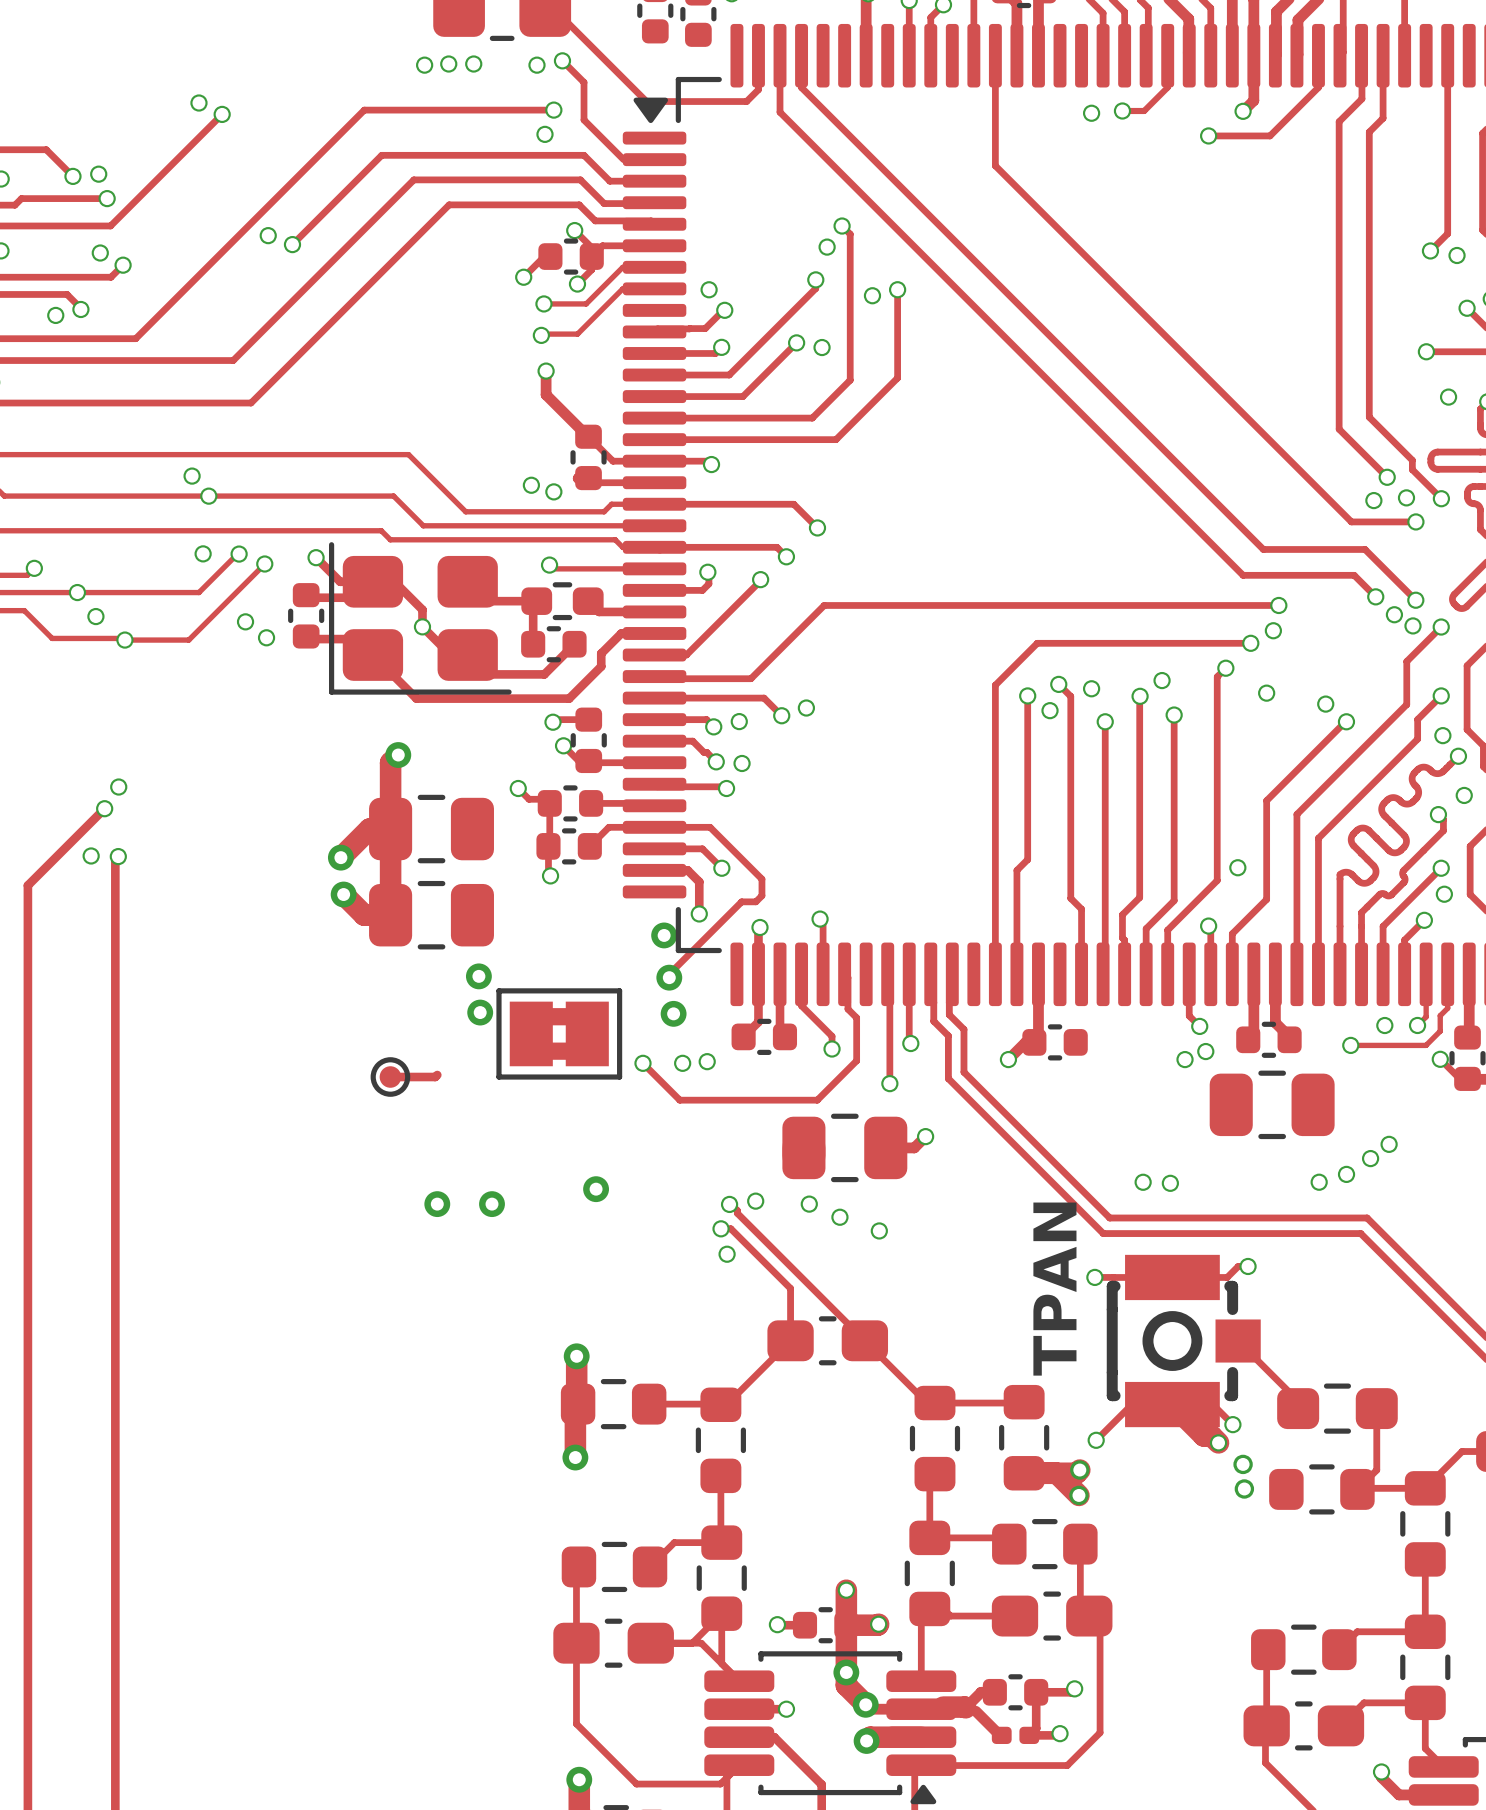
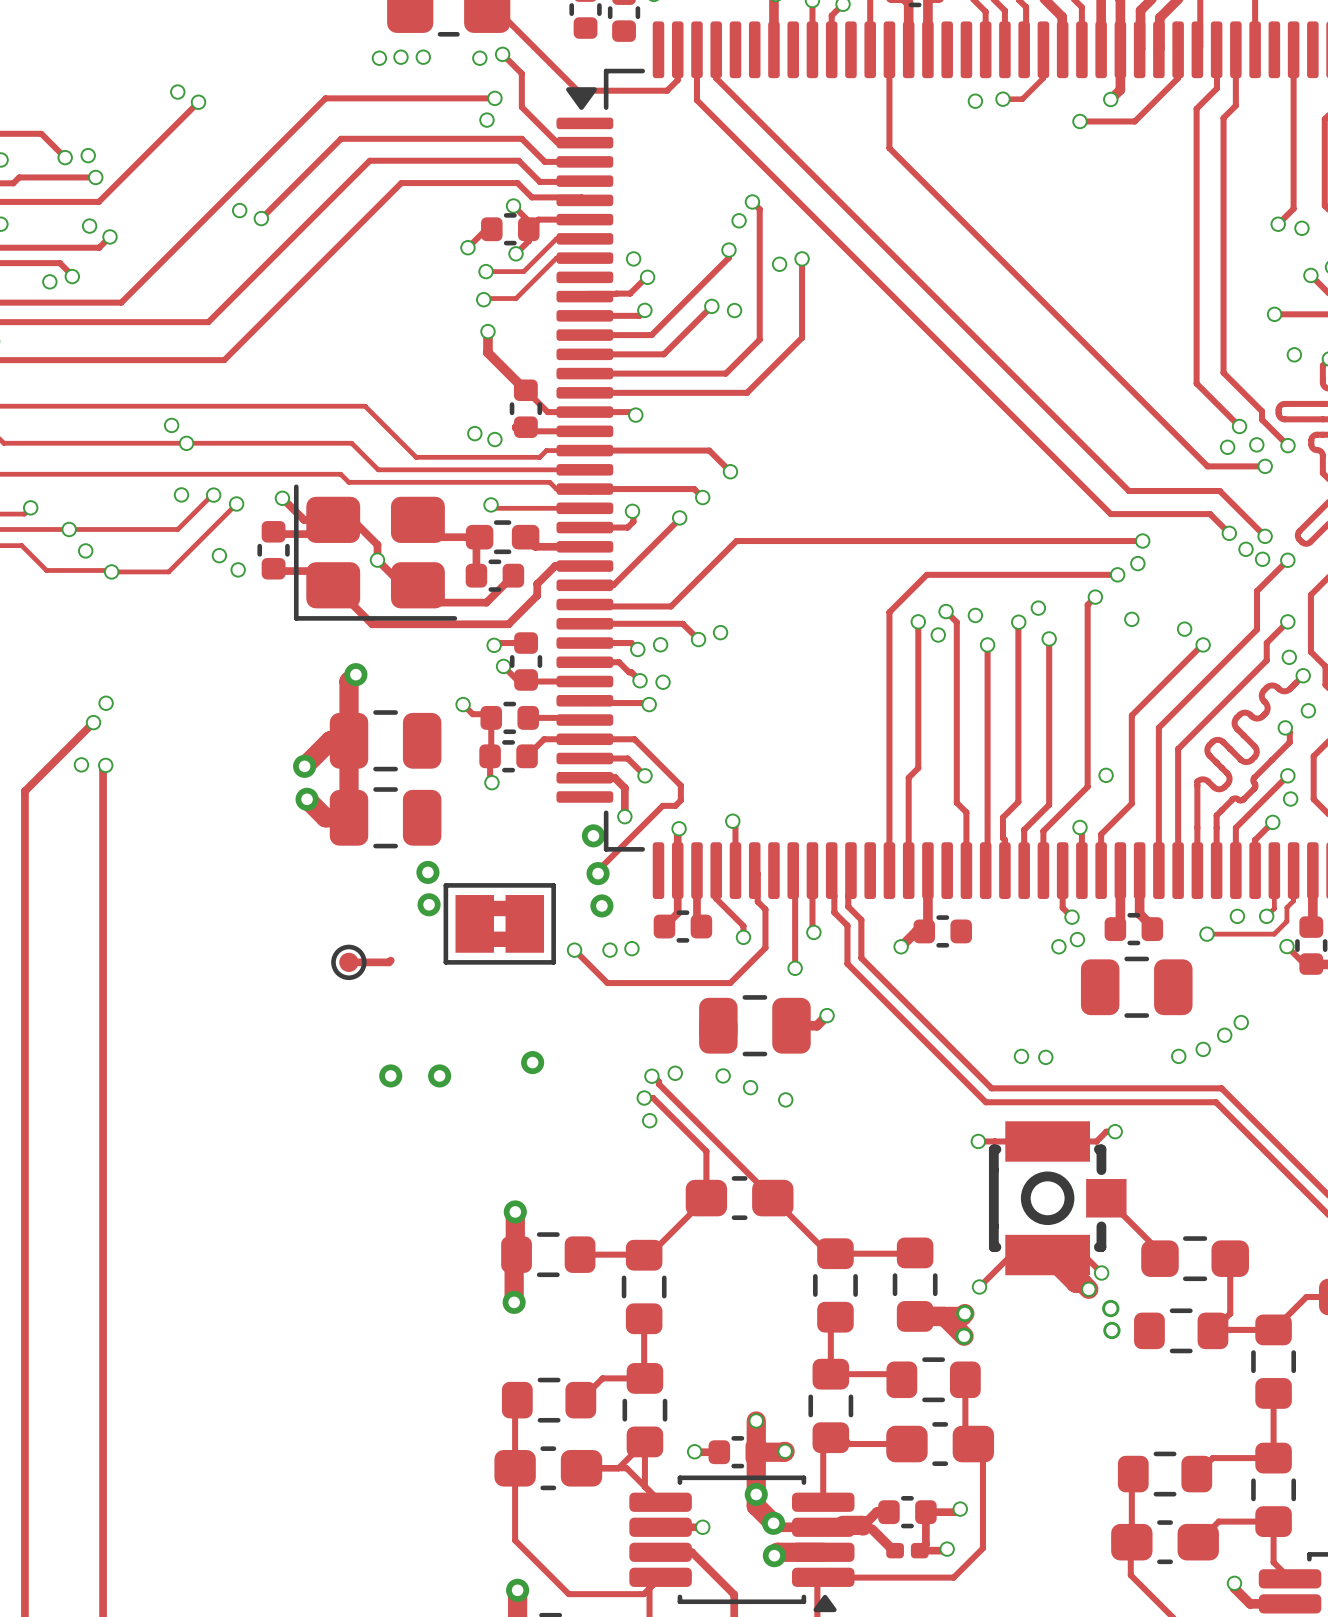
text: TPAN (1054, 1289) -> none

